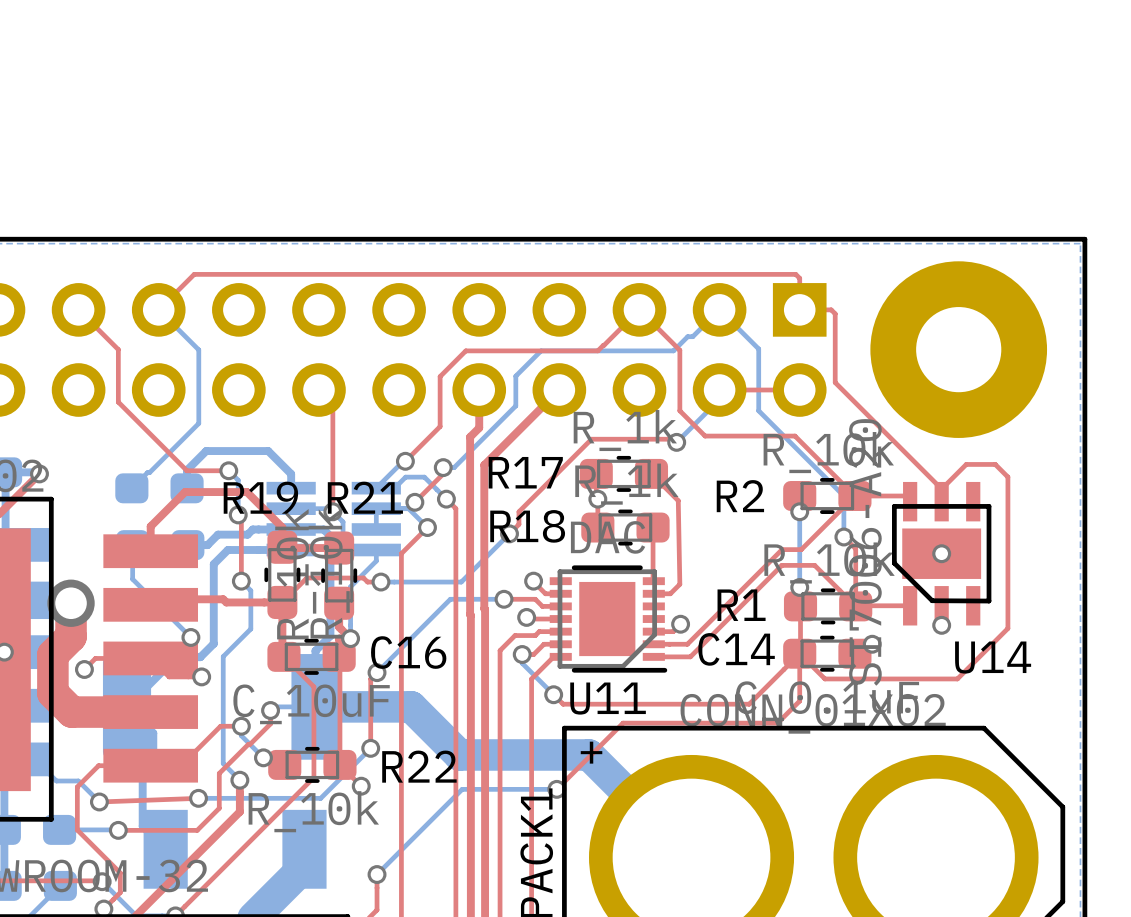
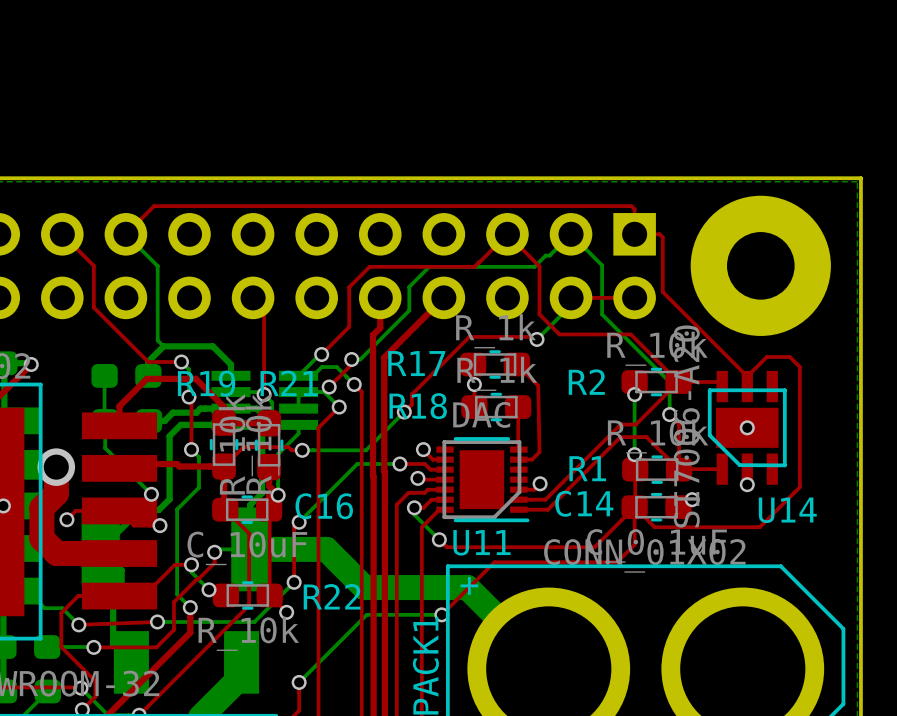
bottom track: (198, 423) (131, 488) -> (157, 324) (157, 340) (163, 346)
bottom track: none -> (104, 375) (105, 421)

